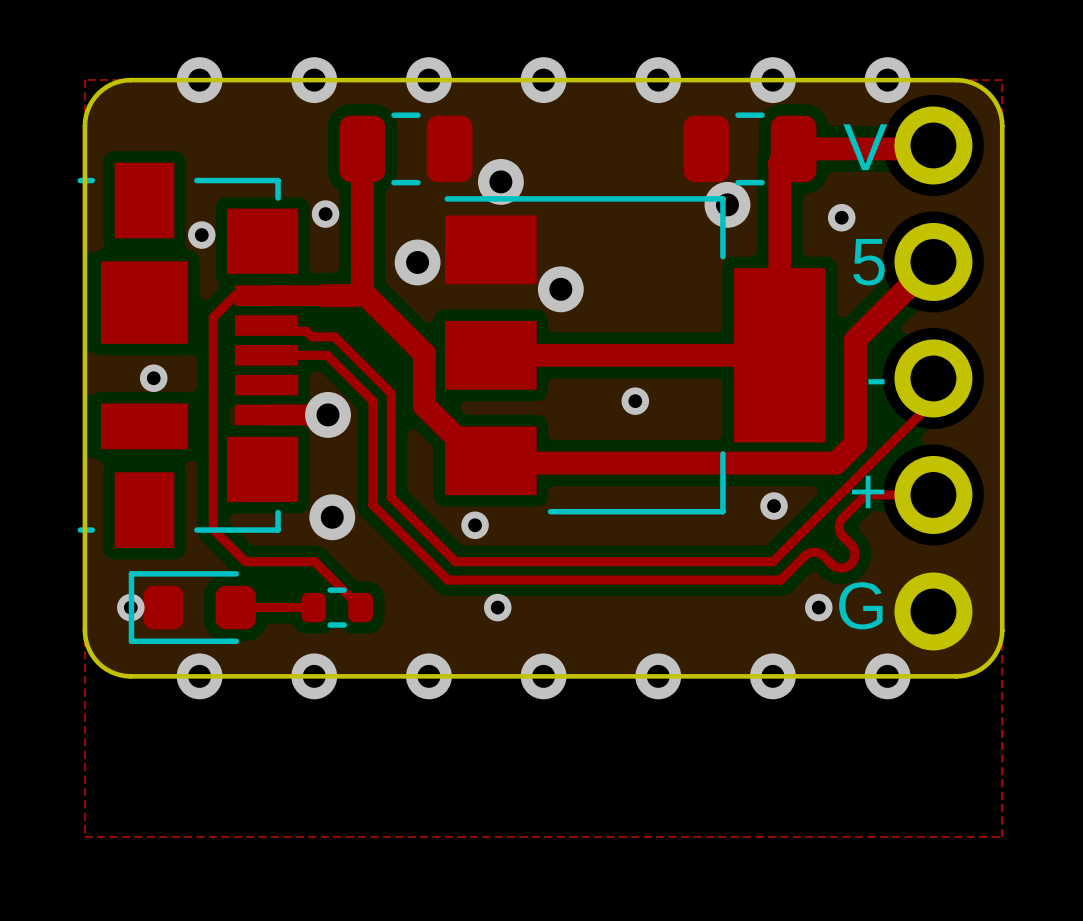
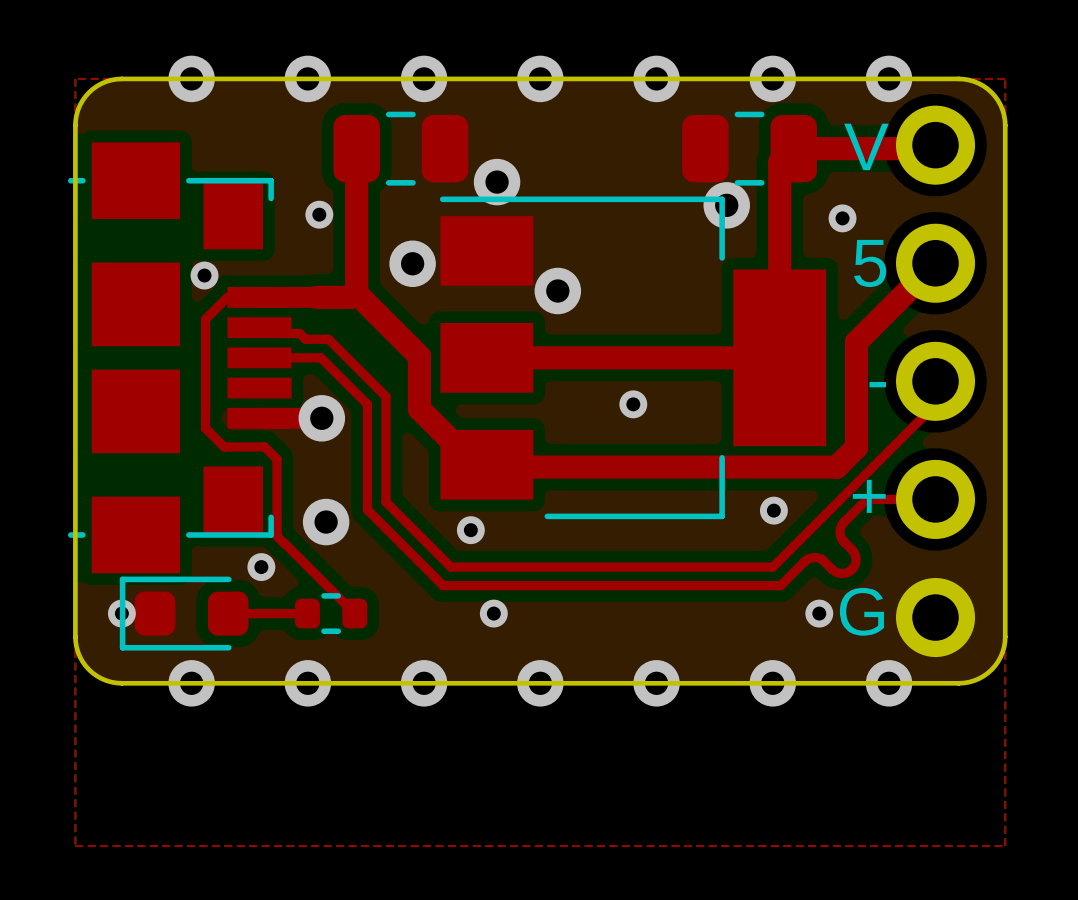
part footprint: [77, 162, 299, 548] -> [67, 142, 292, 574]
via position: (201, 235) -> (204, 275)
via: (153, 378) -> none
top track: (213, 424) (213, 529) (245, 561) (314, 561) -> (205, 428) (224, 446) (264, 446) (277, 459) (277, 536) (284, 543)
top track: none -> (285, 543) (308, 567)
via: none -> (261, 567)

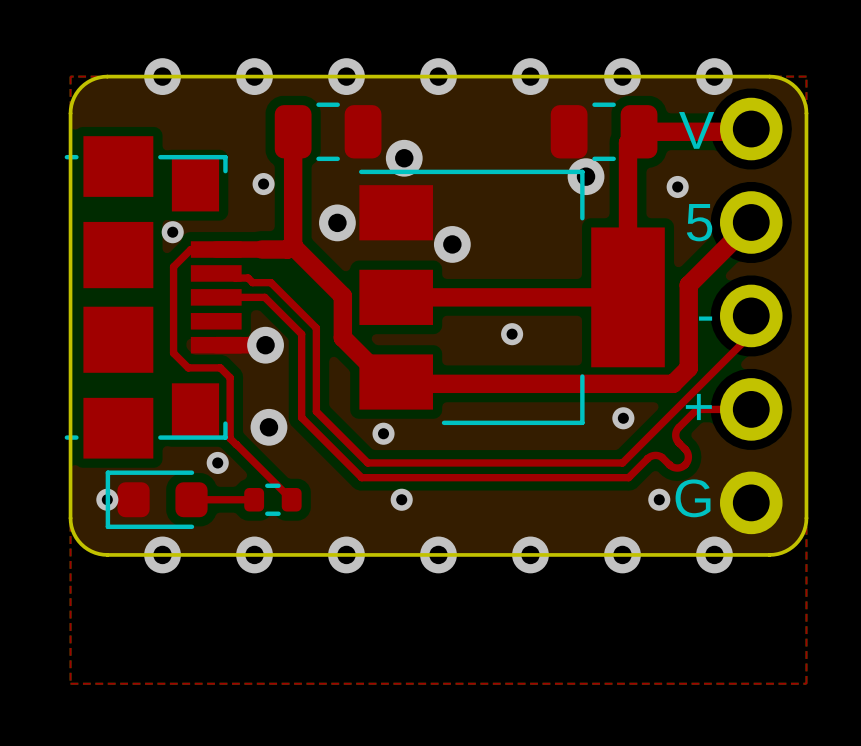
part footprint: [67, 142, 292, 574] -> [64, 136, 242, 459]

